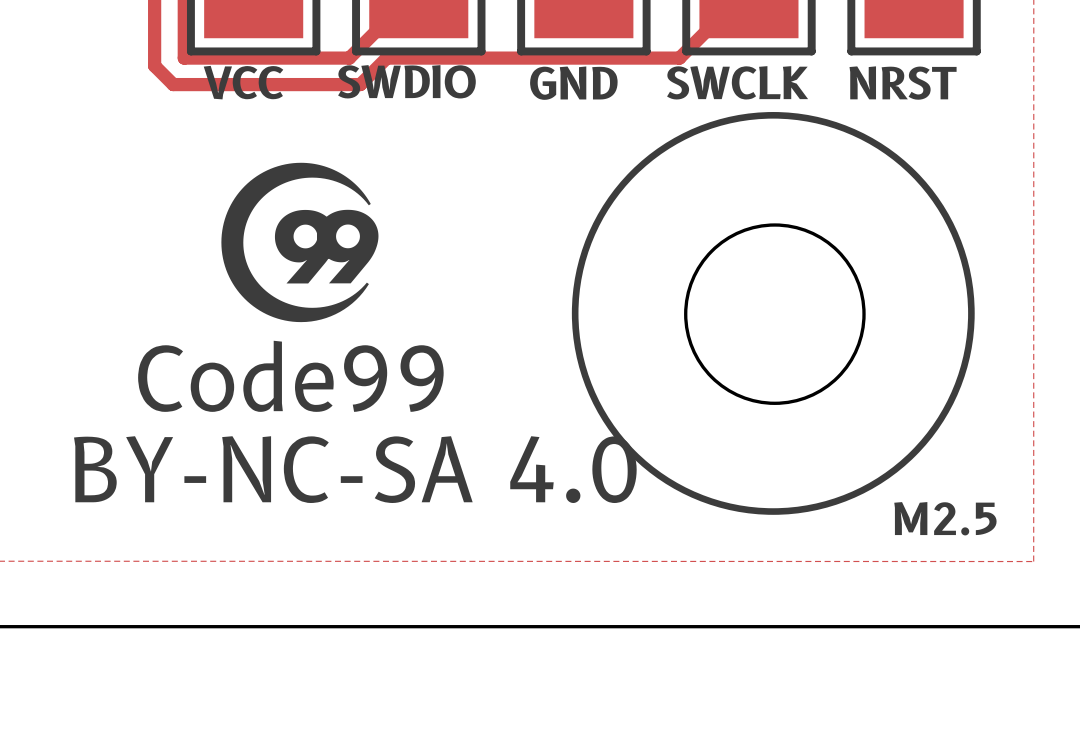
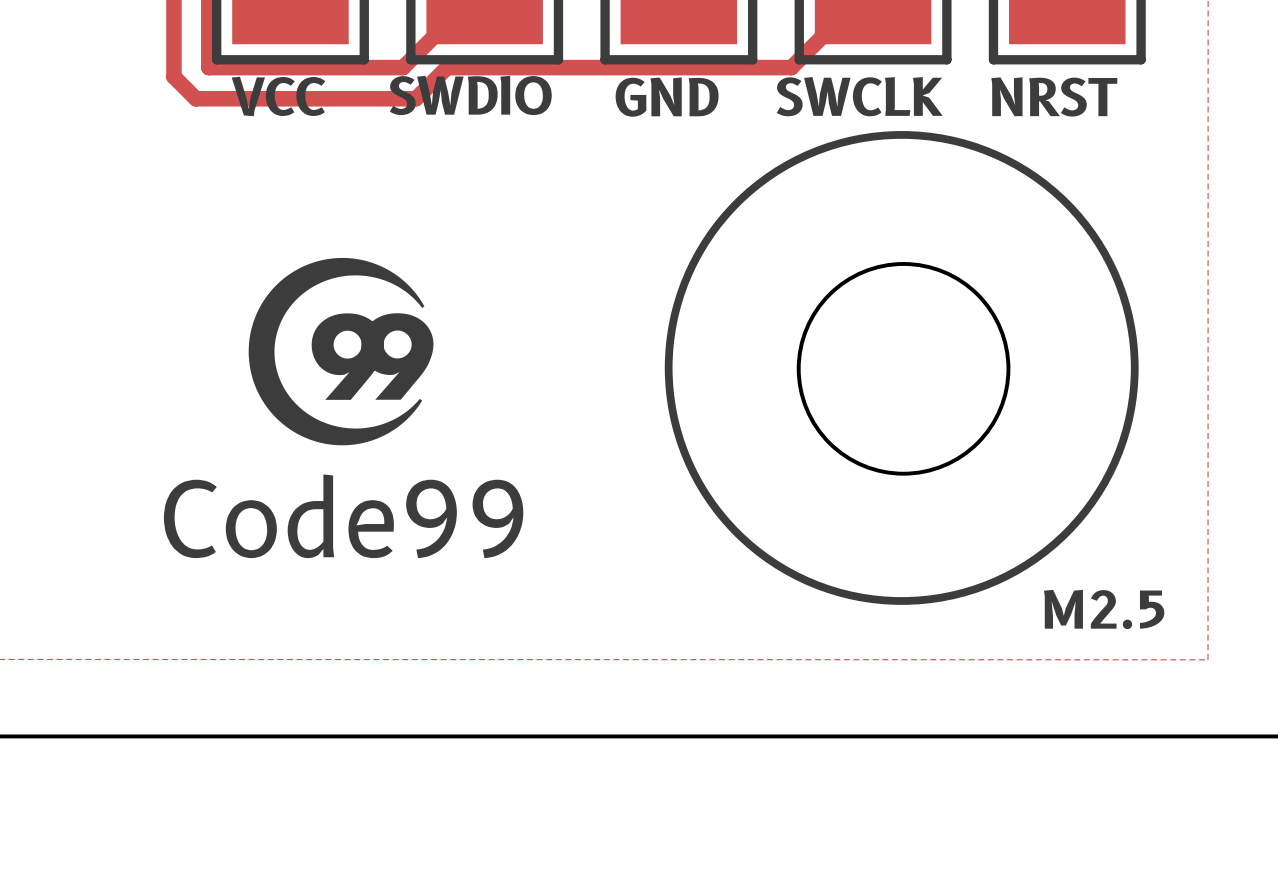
drawing: [274, 209, 379, 284] -> none
drawing position: (296, 242) -> (336, 351)
drawing: none -> [311, 313, 434, 400]
text position: Code99 (290, 376) -> Code99 (343, 516)
text: BY-NC-SA 4.0 (355, 469) -> none

